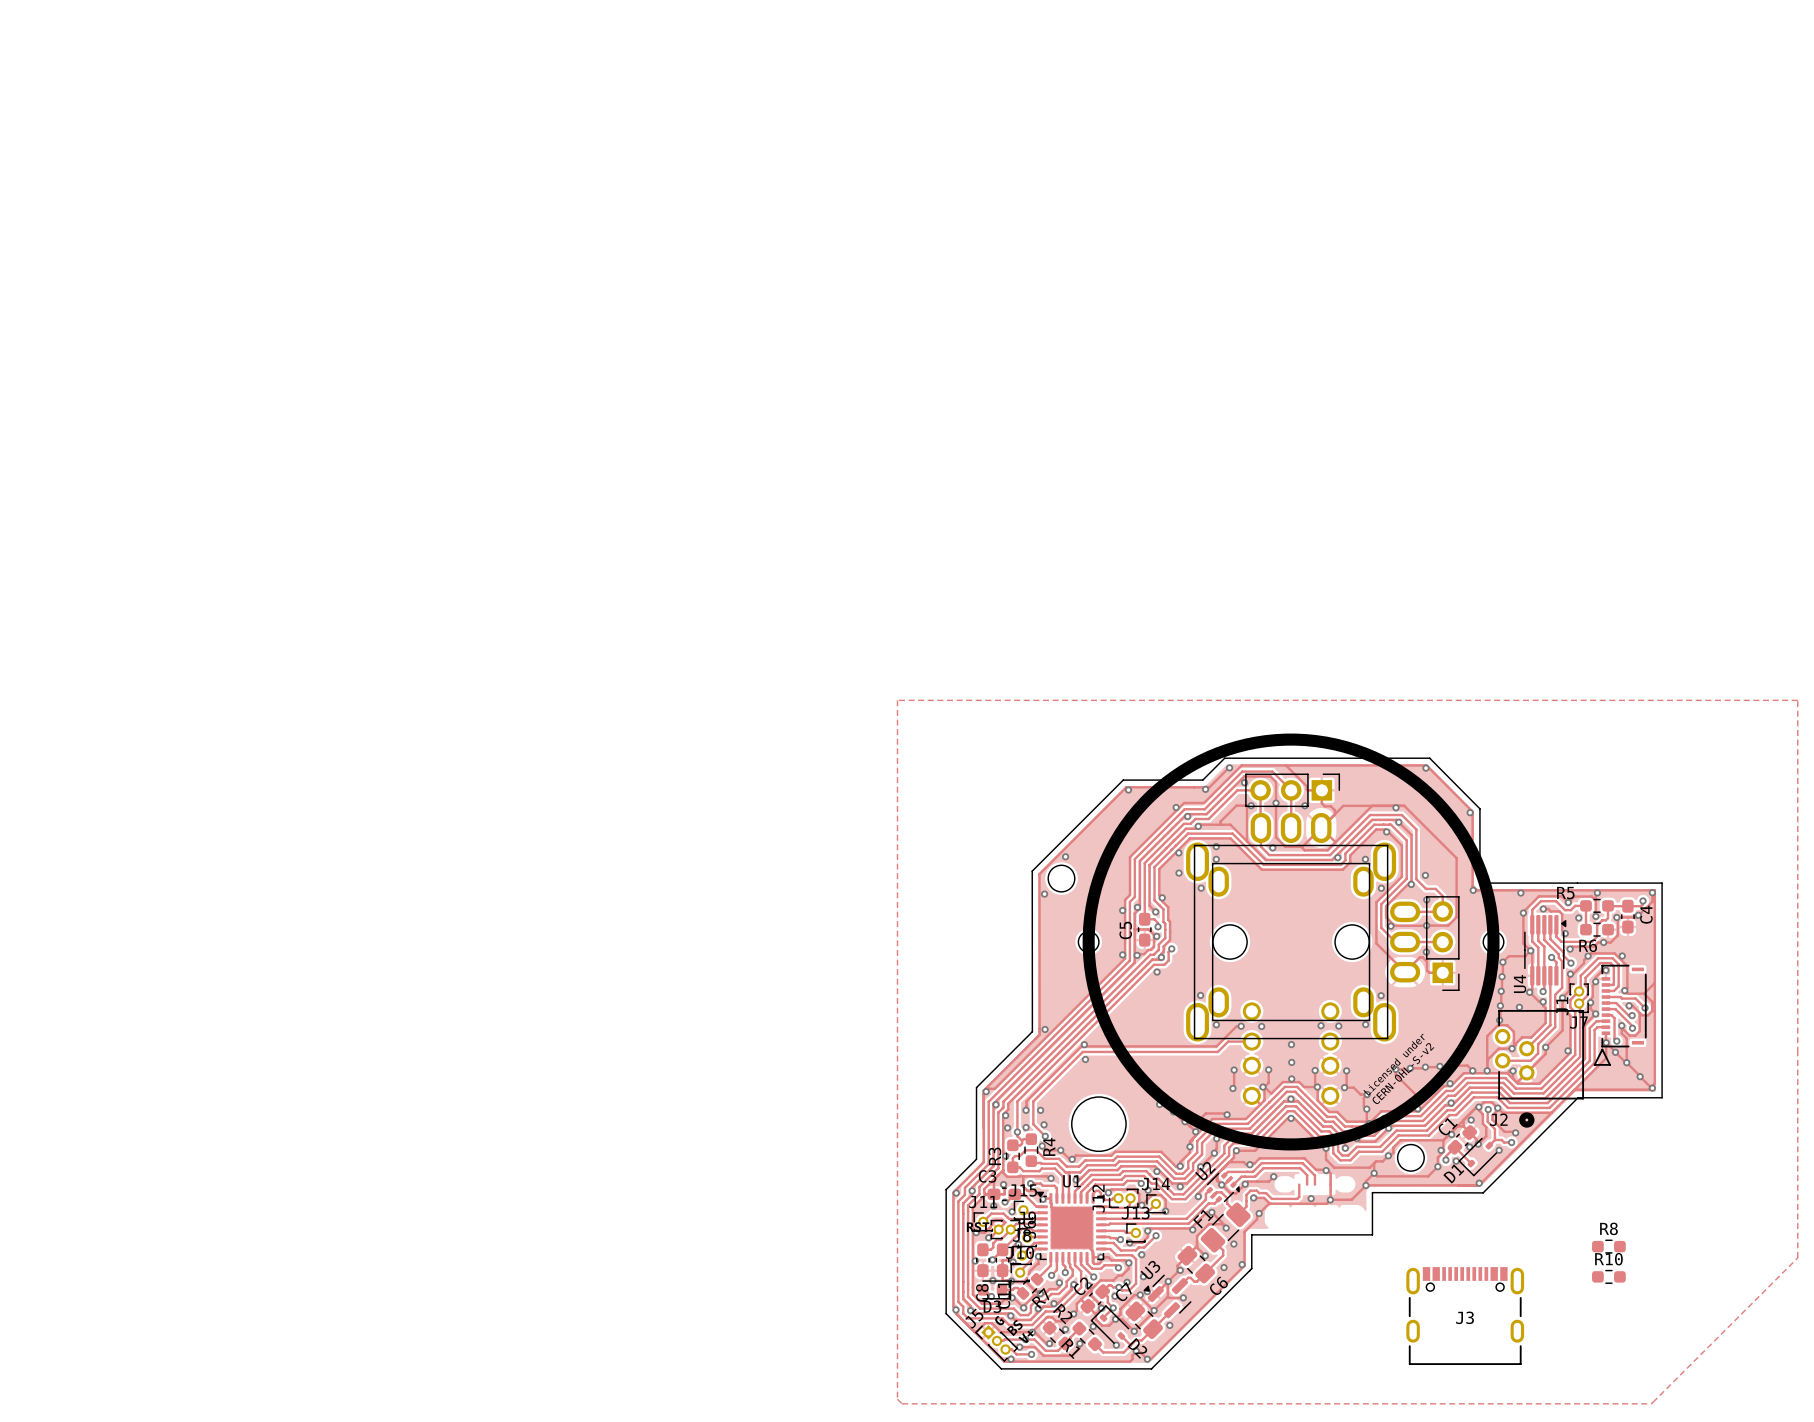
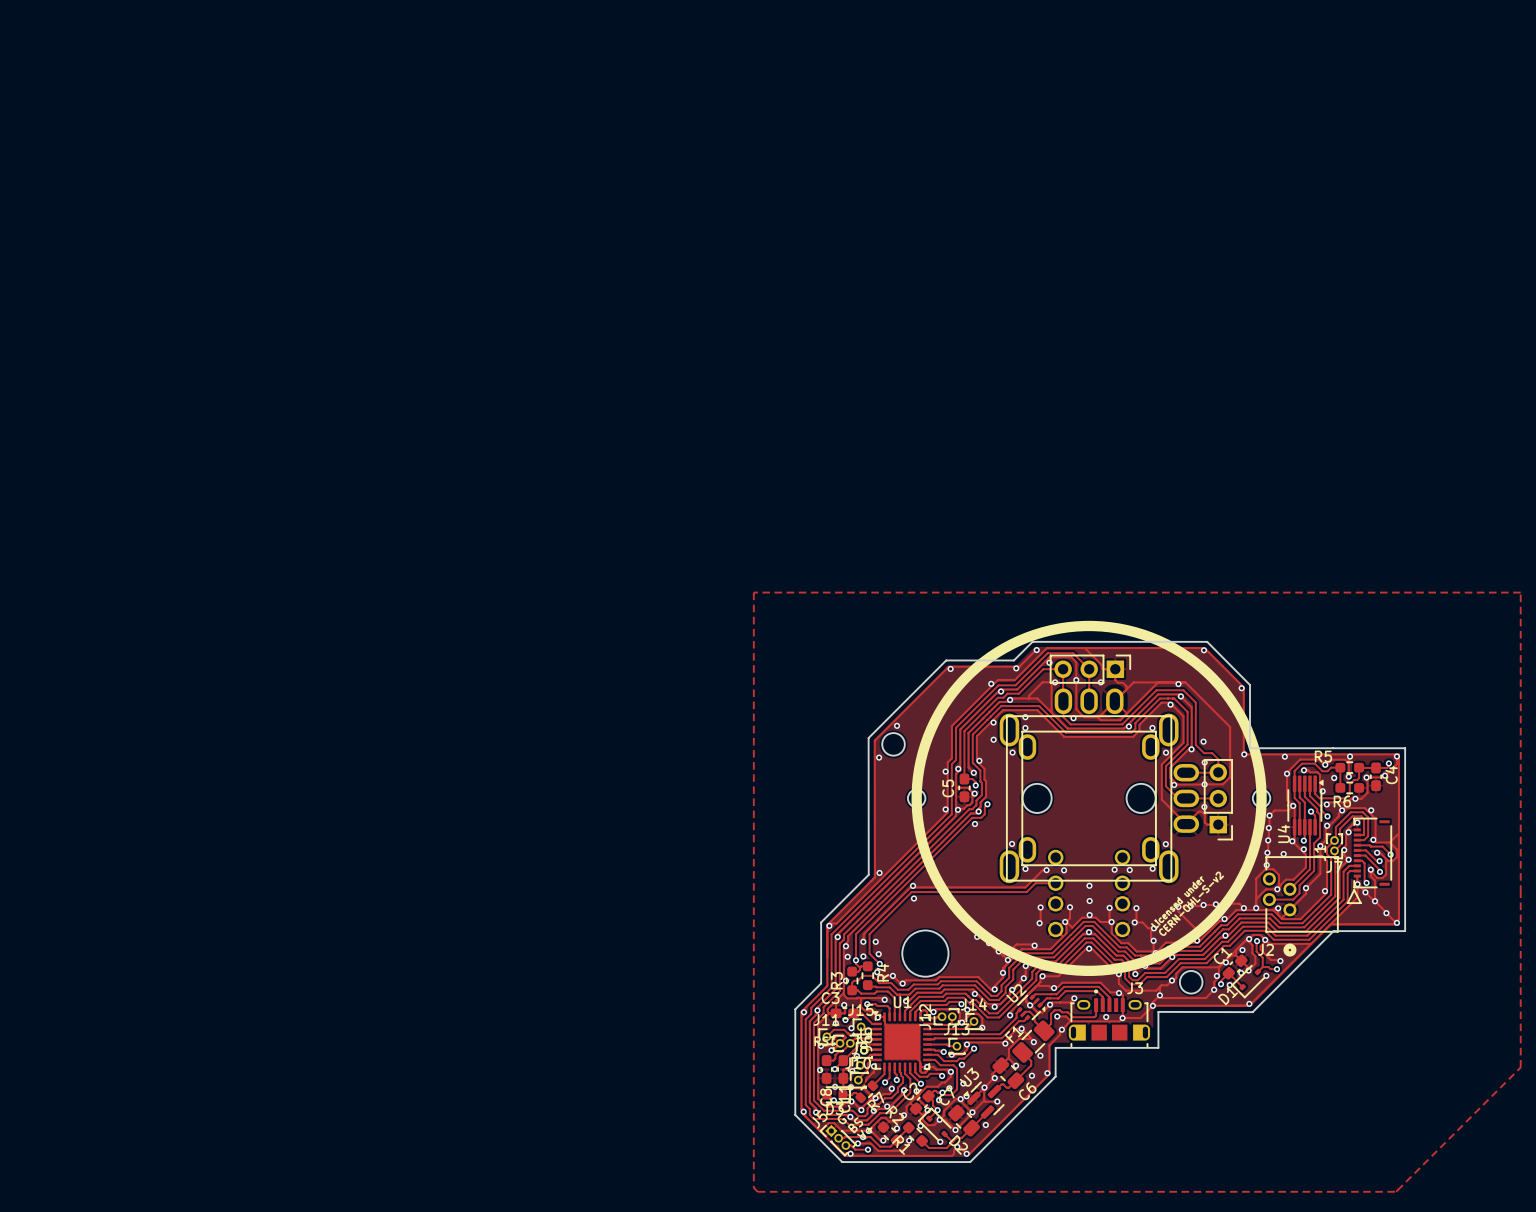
R8: (1608, 1246) -> none
J3 footprint: [1406, 1267, 1525, 1366] -> [1068, 989, 1151, 1049]
R10: (1608, 1276) -> none
J3 name position: J3 (1465, 1317) -> J3 (1135, 988)

